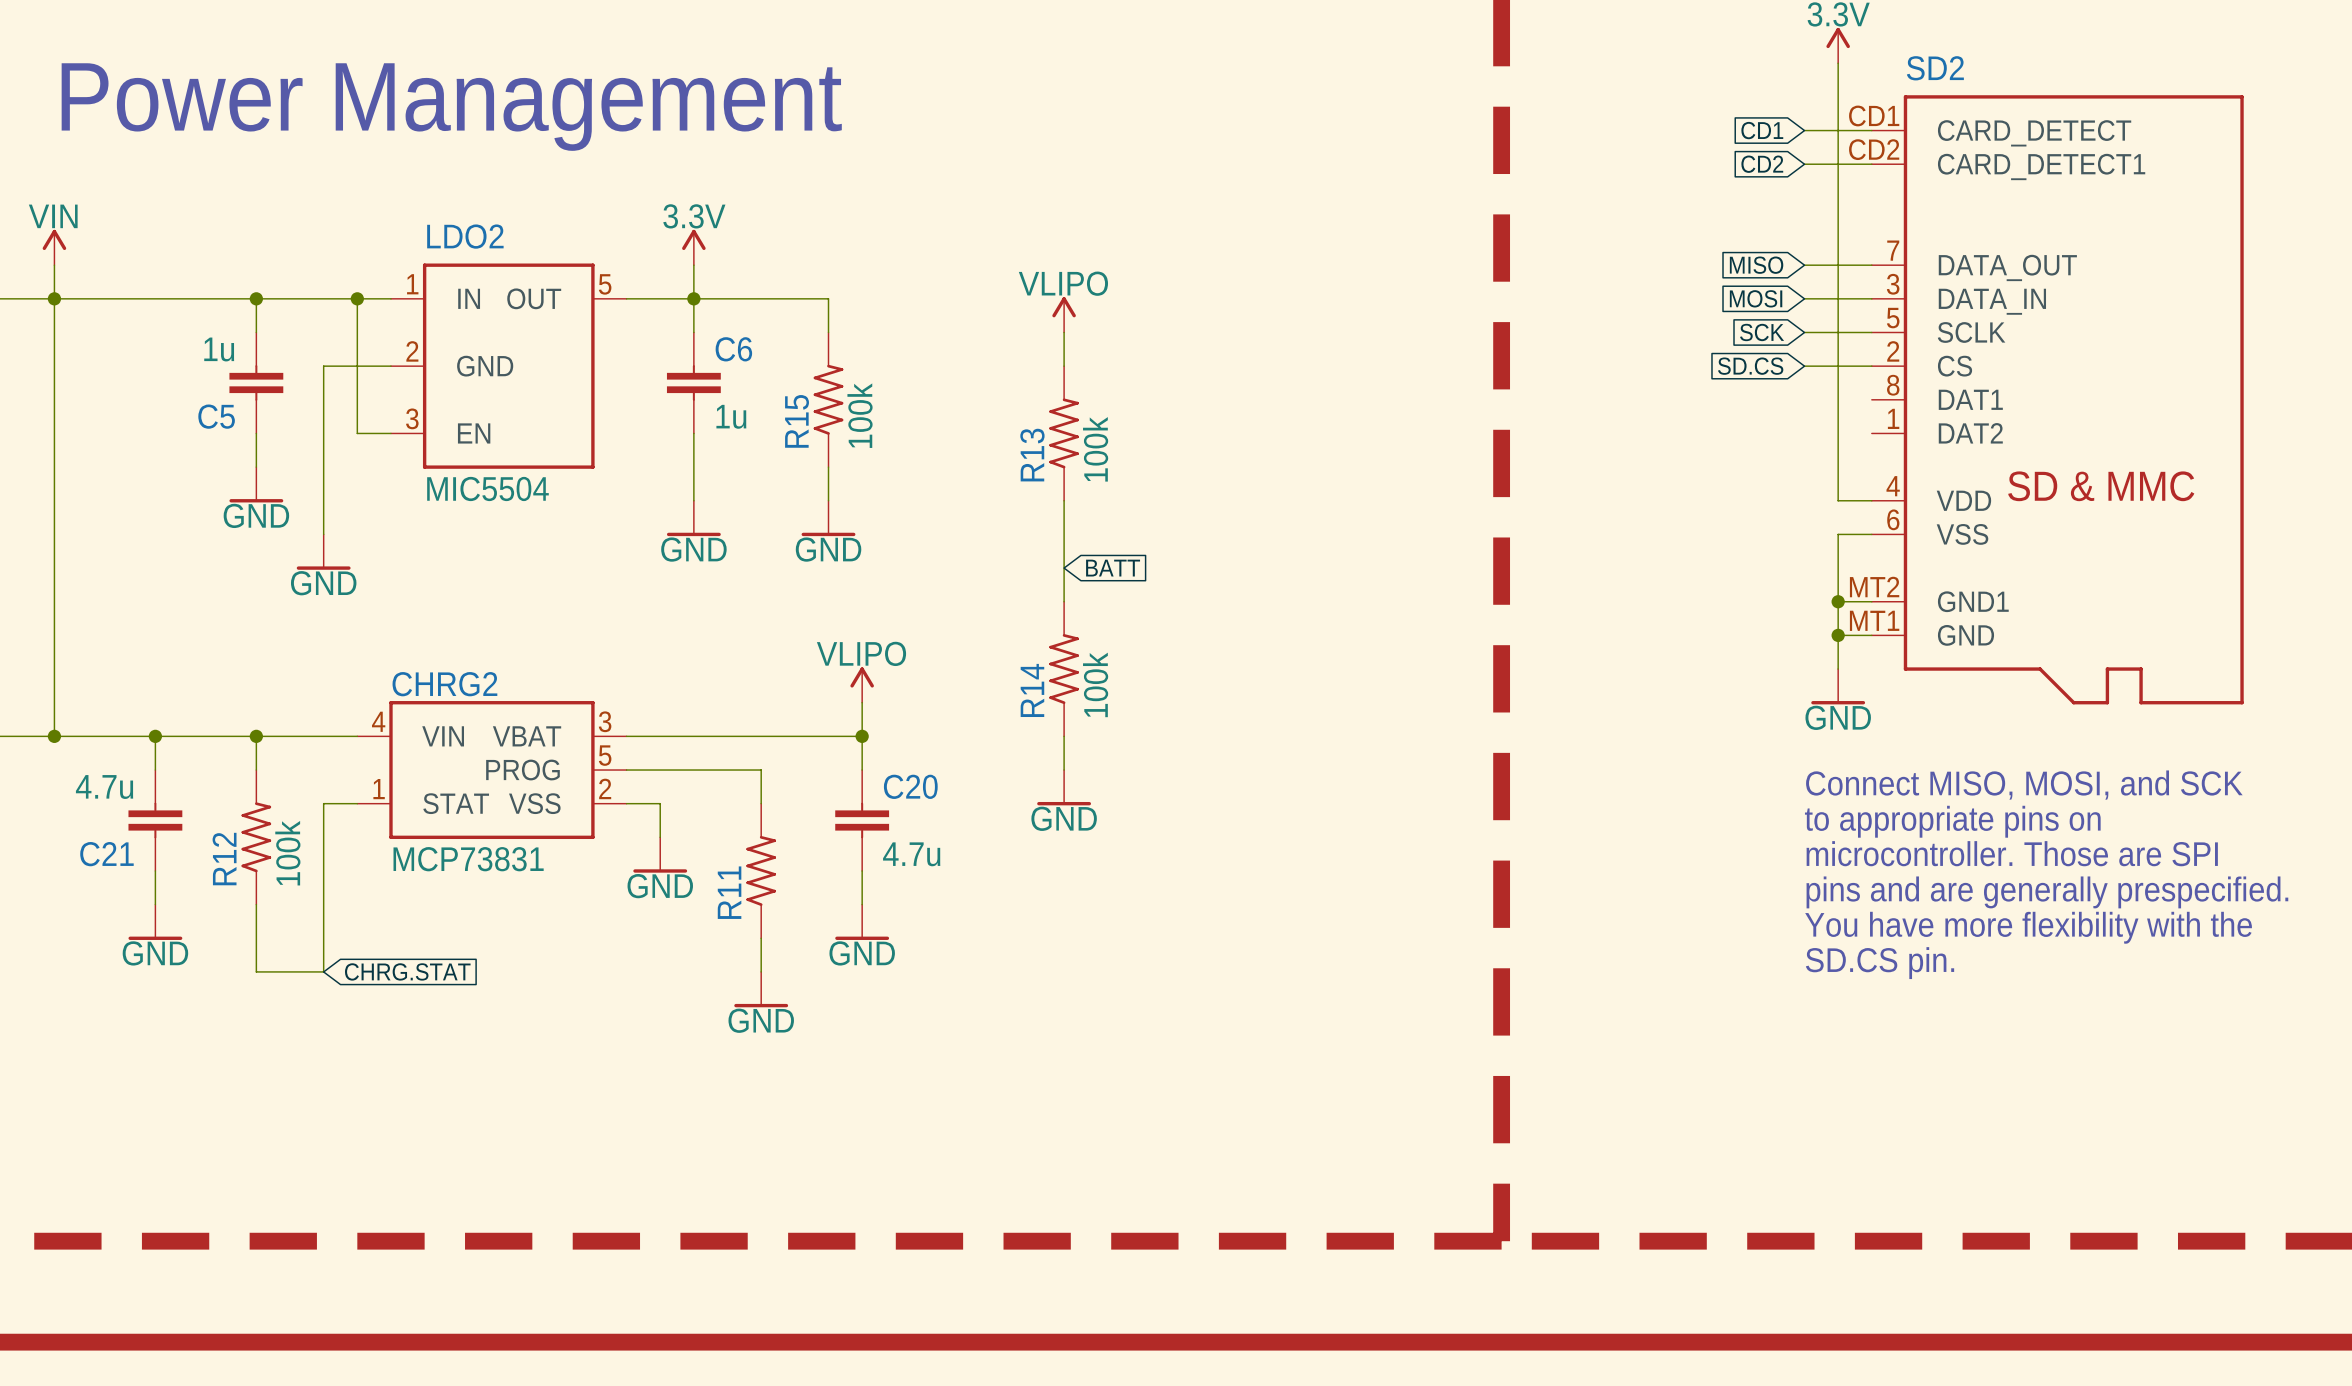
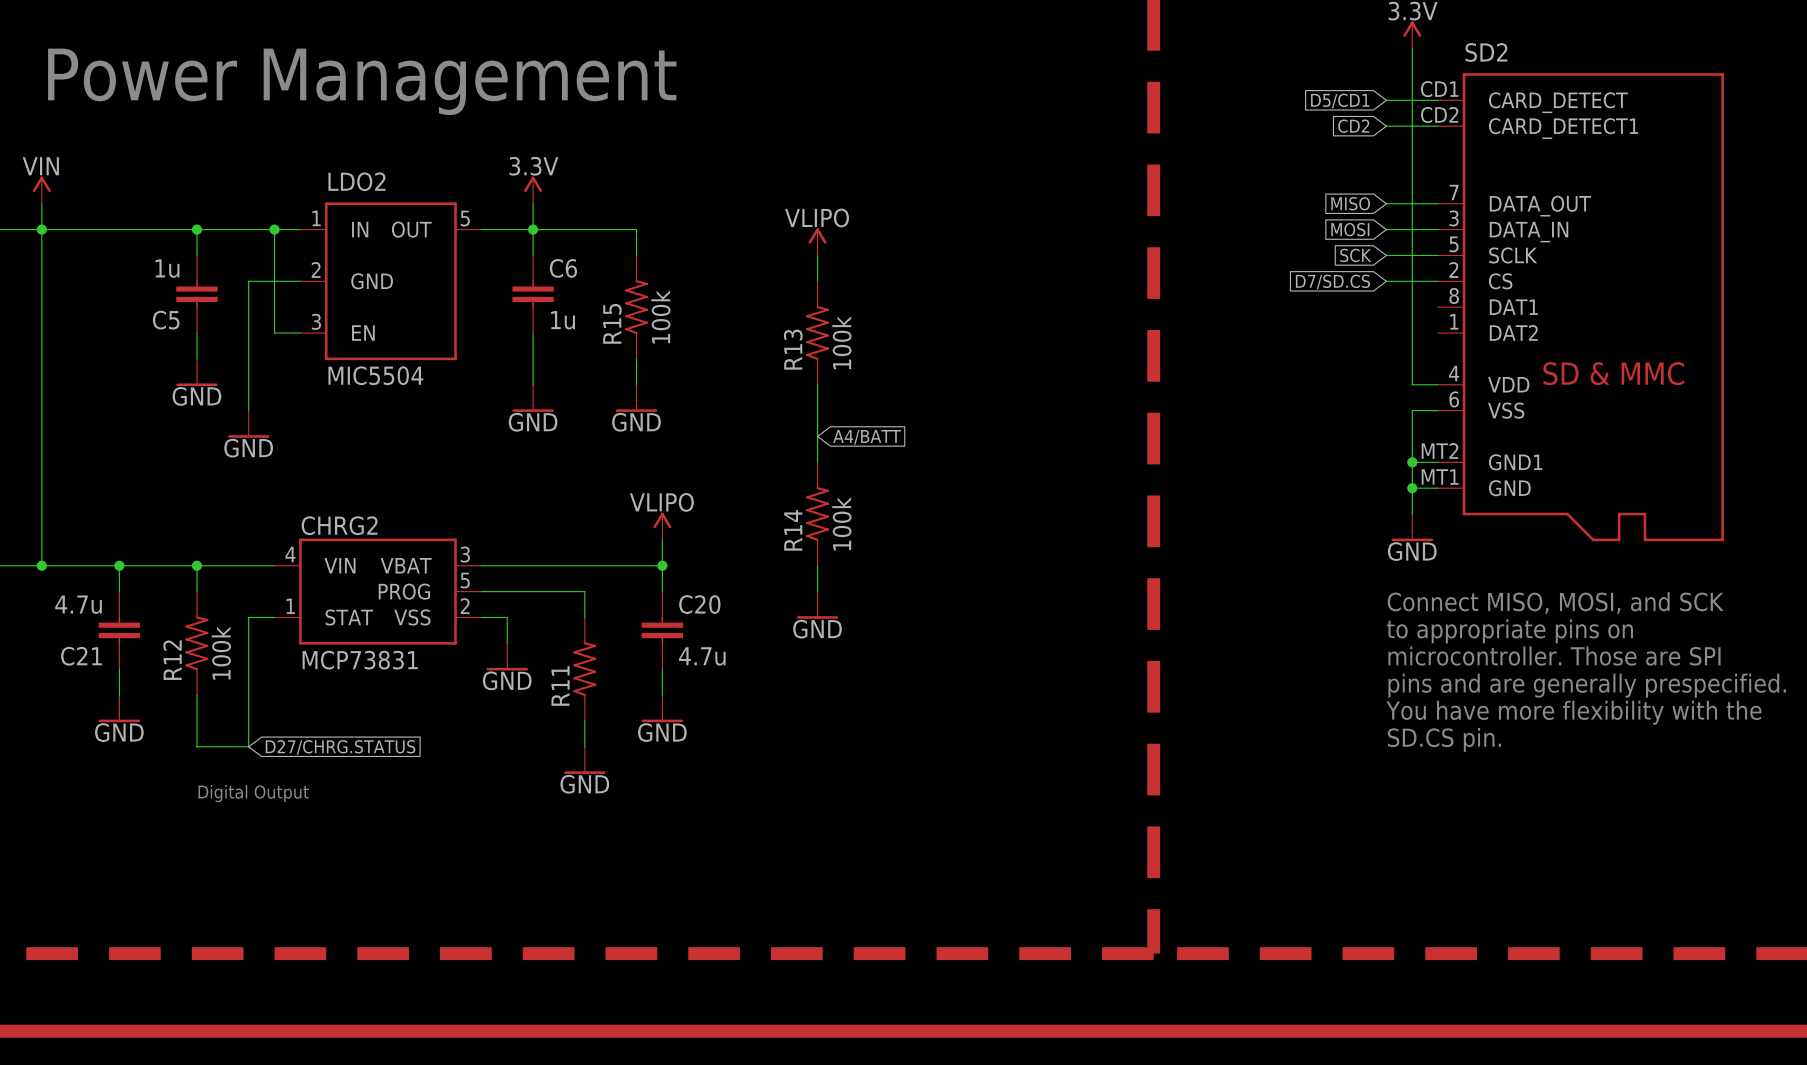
global label: CD1 (1762, 130) -> D5/CD1 (1340, 101)
global label: SD.CS (1750, 366) -> D7/SD.CS (1332, 282)
global label: BATT (1113, 568) -> A4/BATT (867, 437)
global label: CHRG.STAT (407, 971) -> D27/CHRG.STATUS (340, 747)
text: none -> Digital Output (253, 793)

